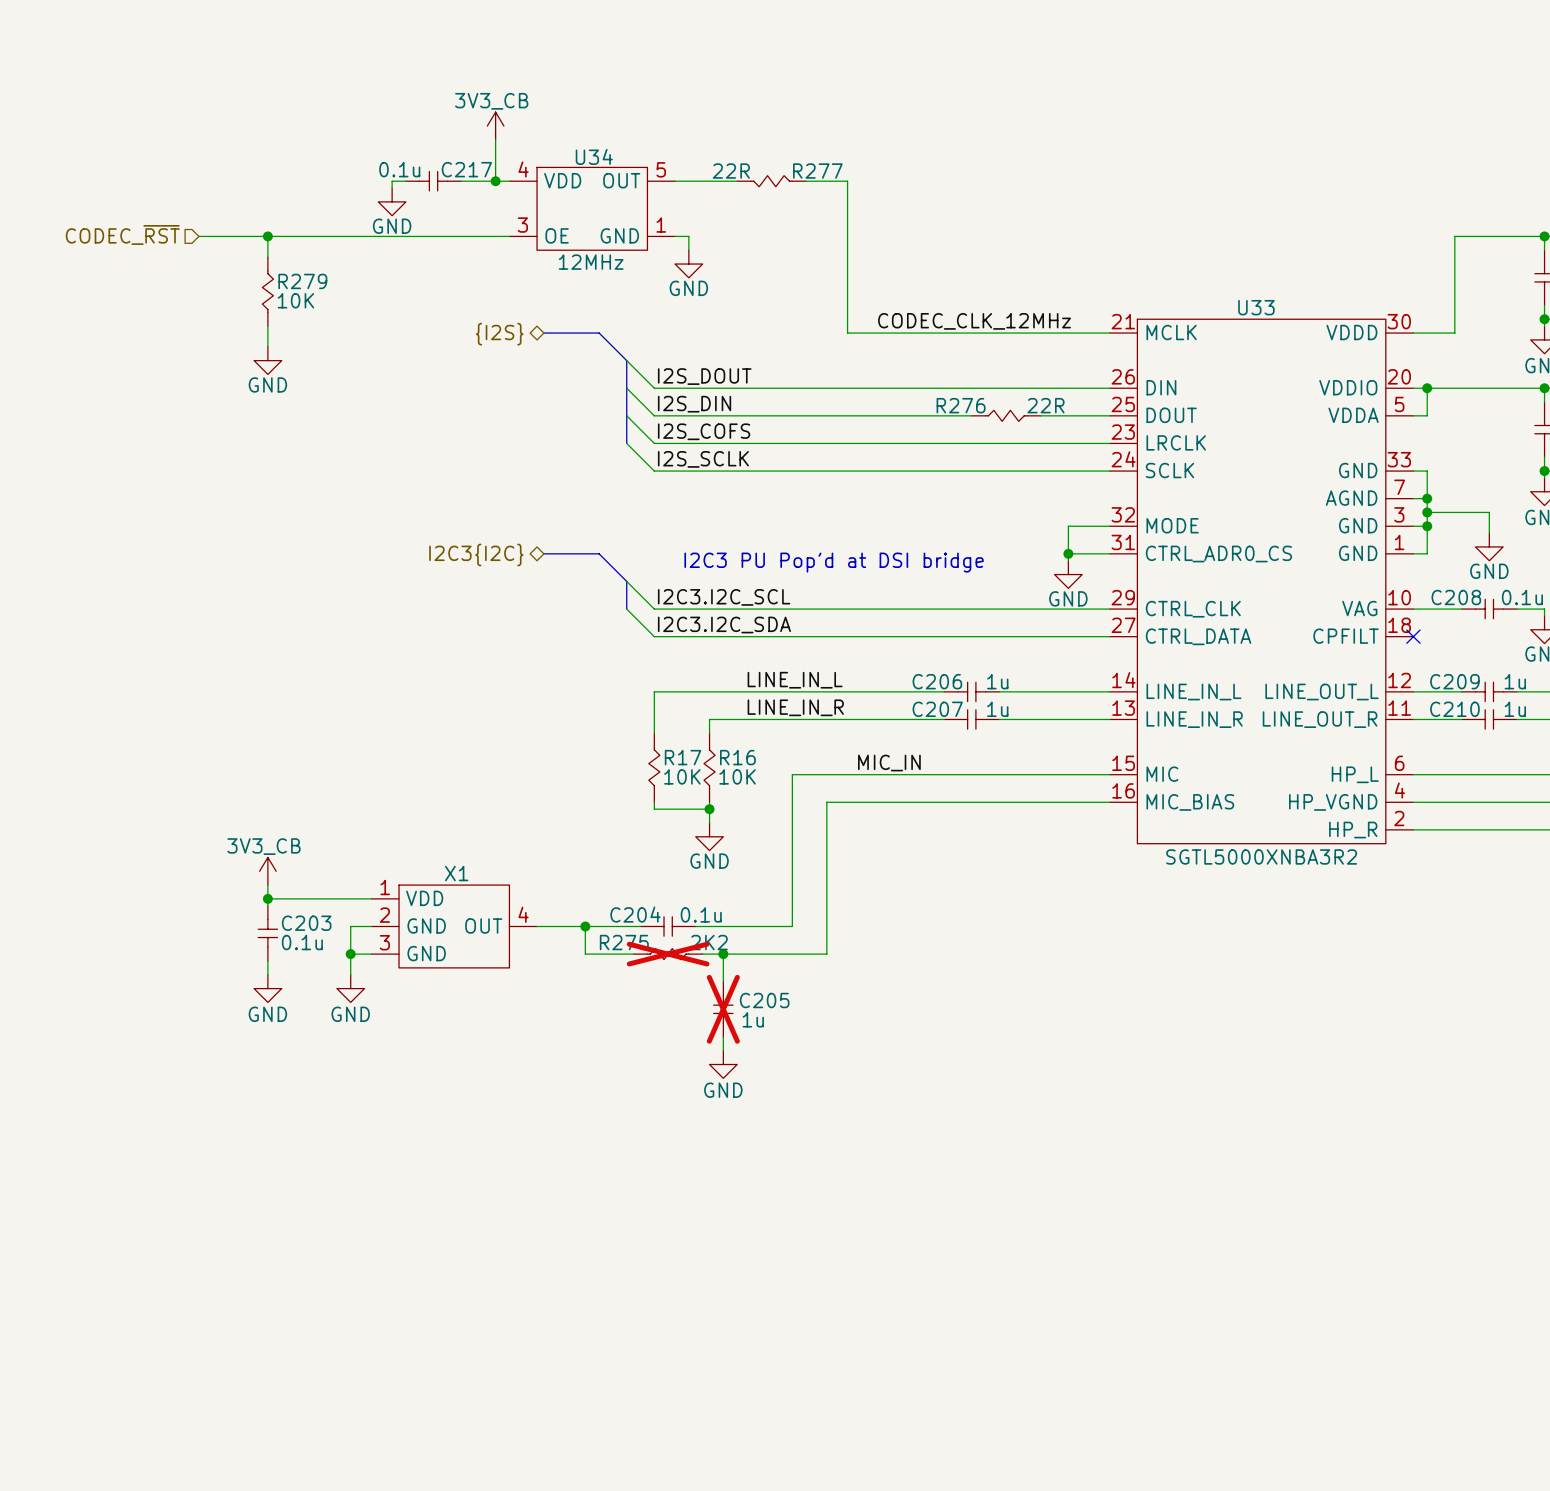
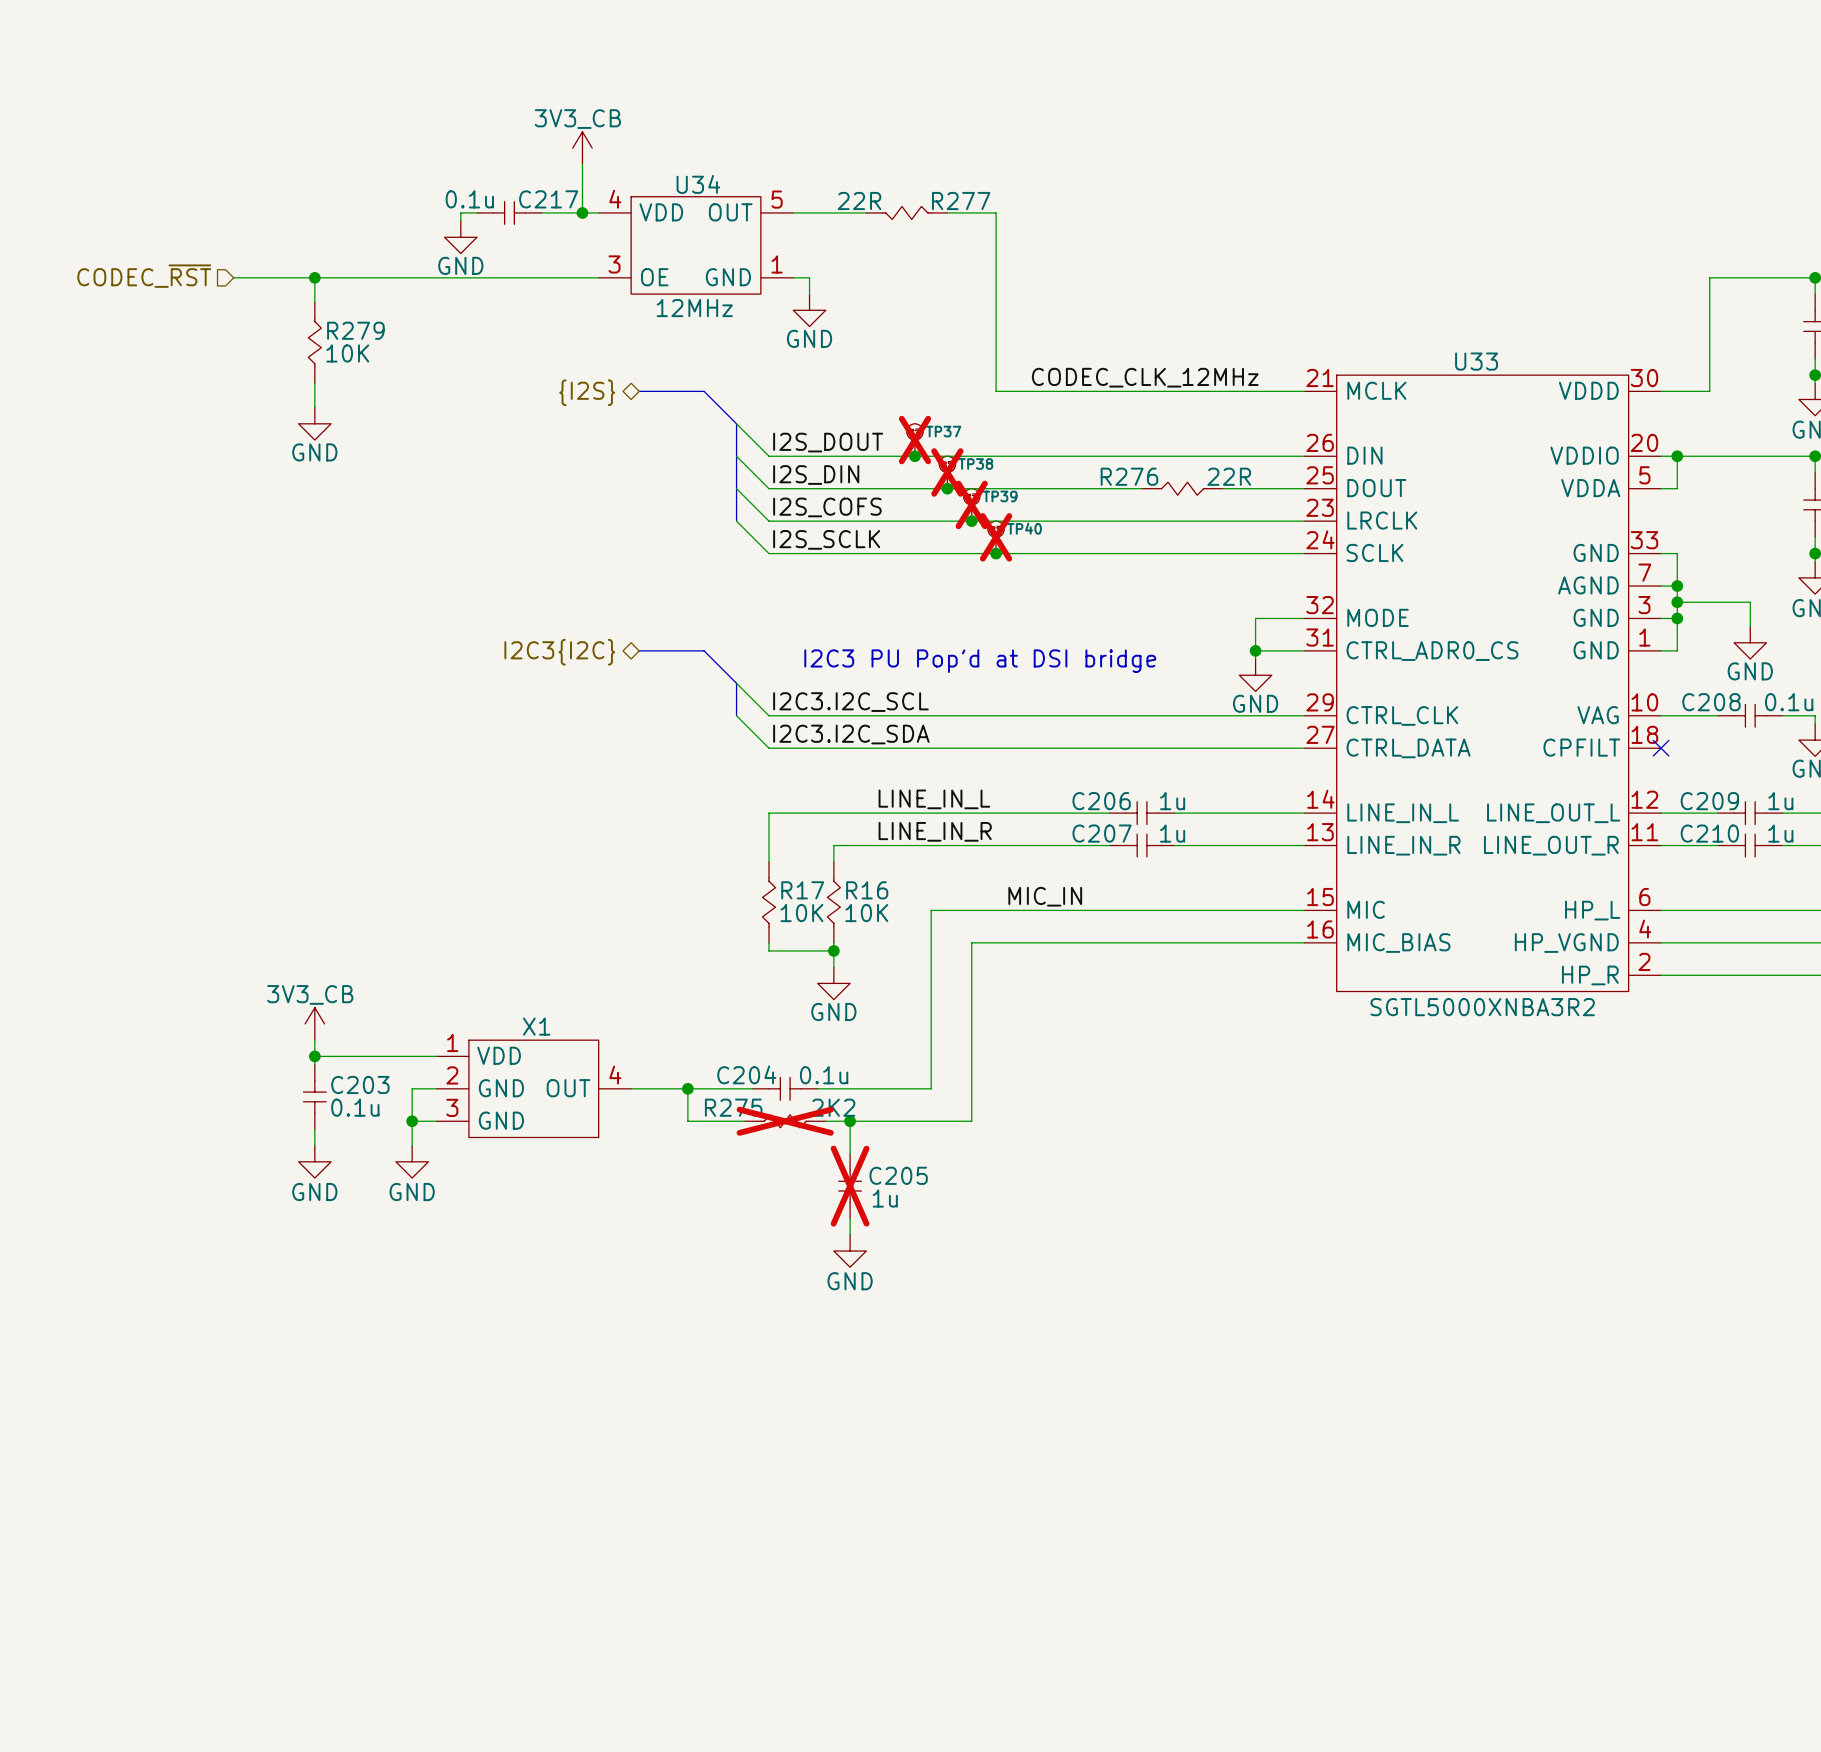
TP37: none -> (914, 440)
junction: none -> (914, 456)
TP38: none -> (947, 472)
junction: none -> (947, 488)
TP39: none -> (971, 504)
junction: none -> (971, 521)
TP40: none -> (996, 537)
junction: none -> (996, 553)

